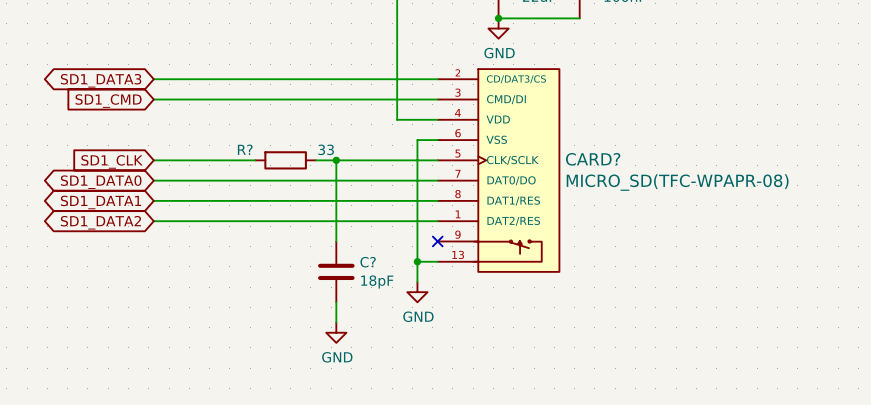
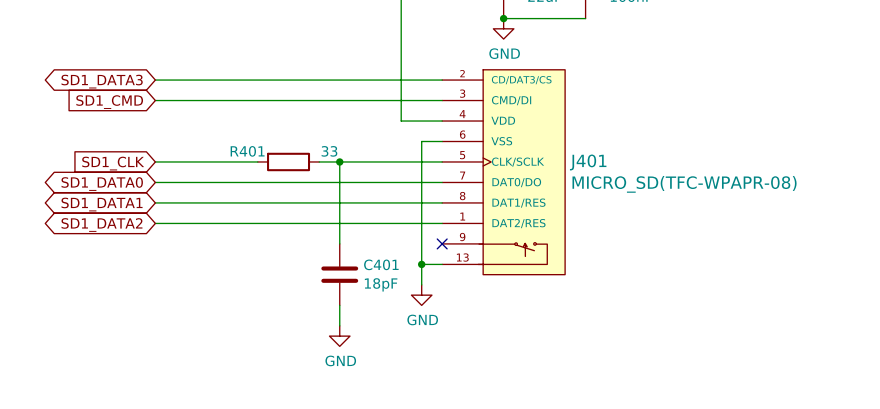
R? name: R? (245, 149) -> R401 (247, 151)
CARD? name: CARD? (593, 159) -> J401 (588, 162)
C? name: C? (368, 262) -> C401 (381, 264)

